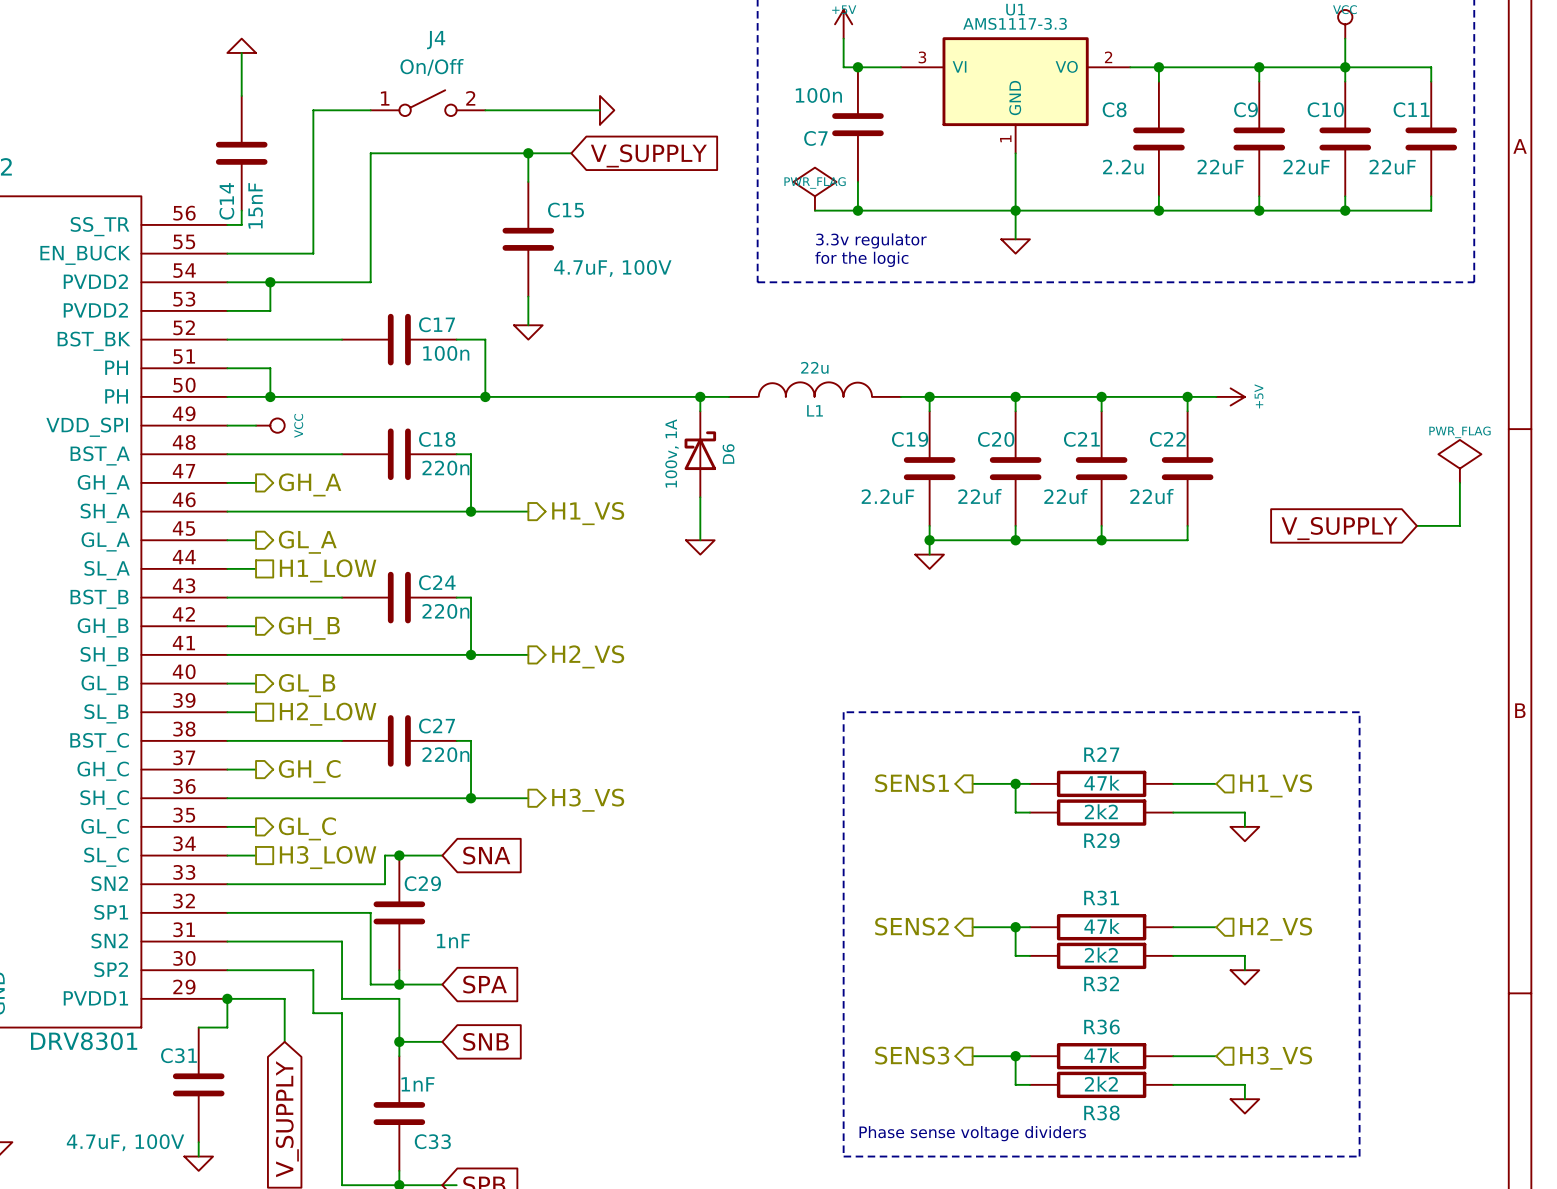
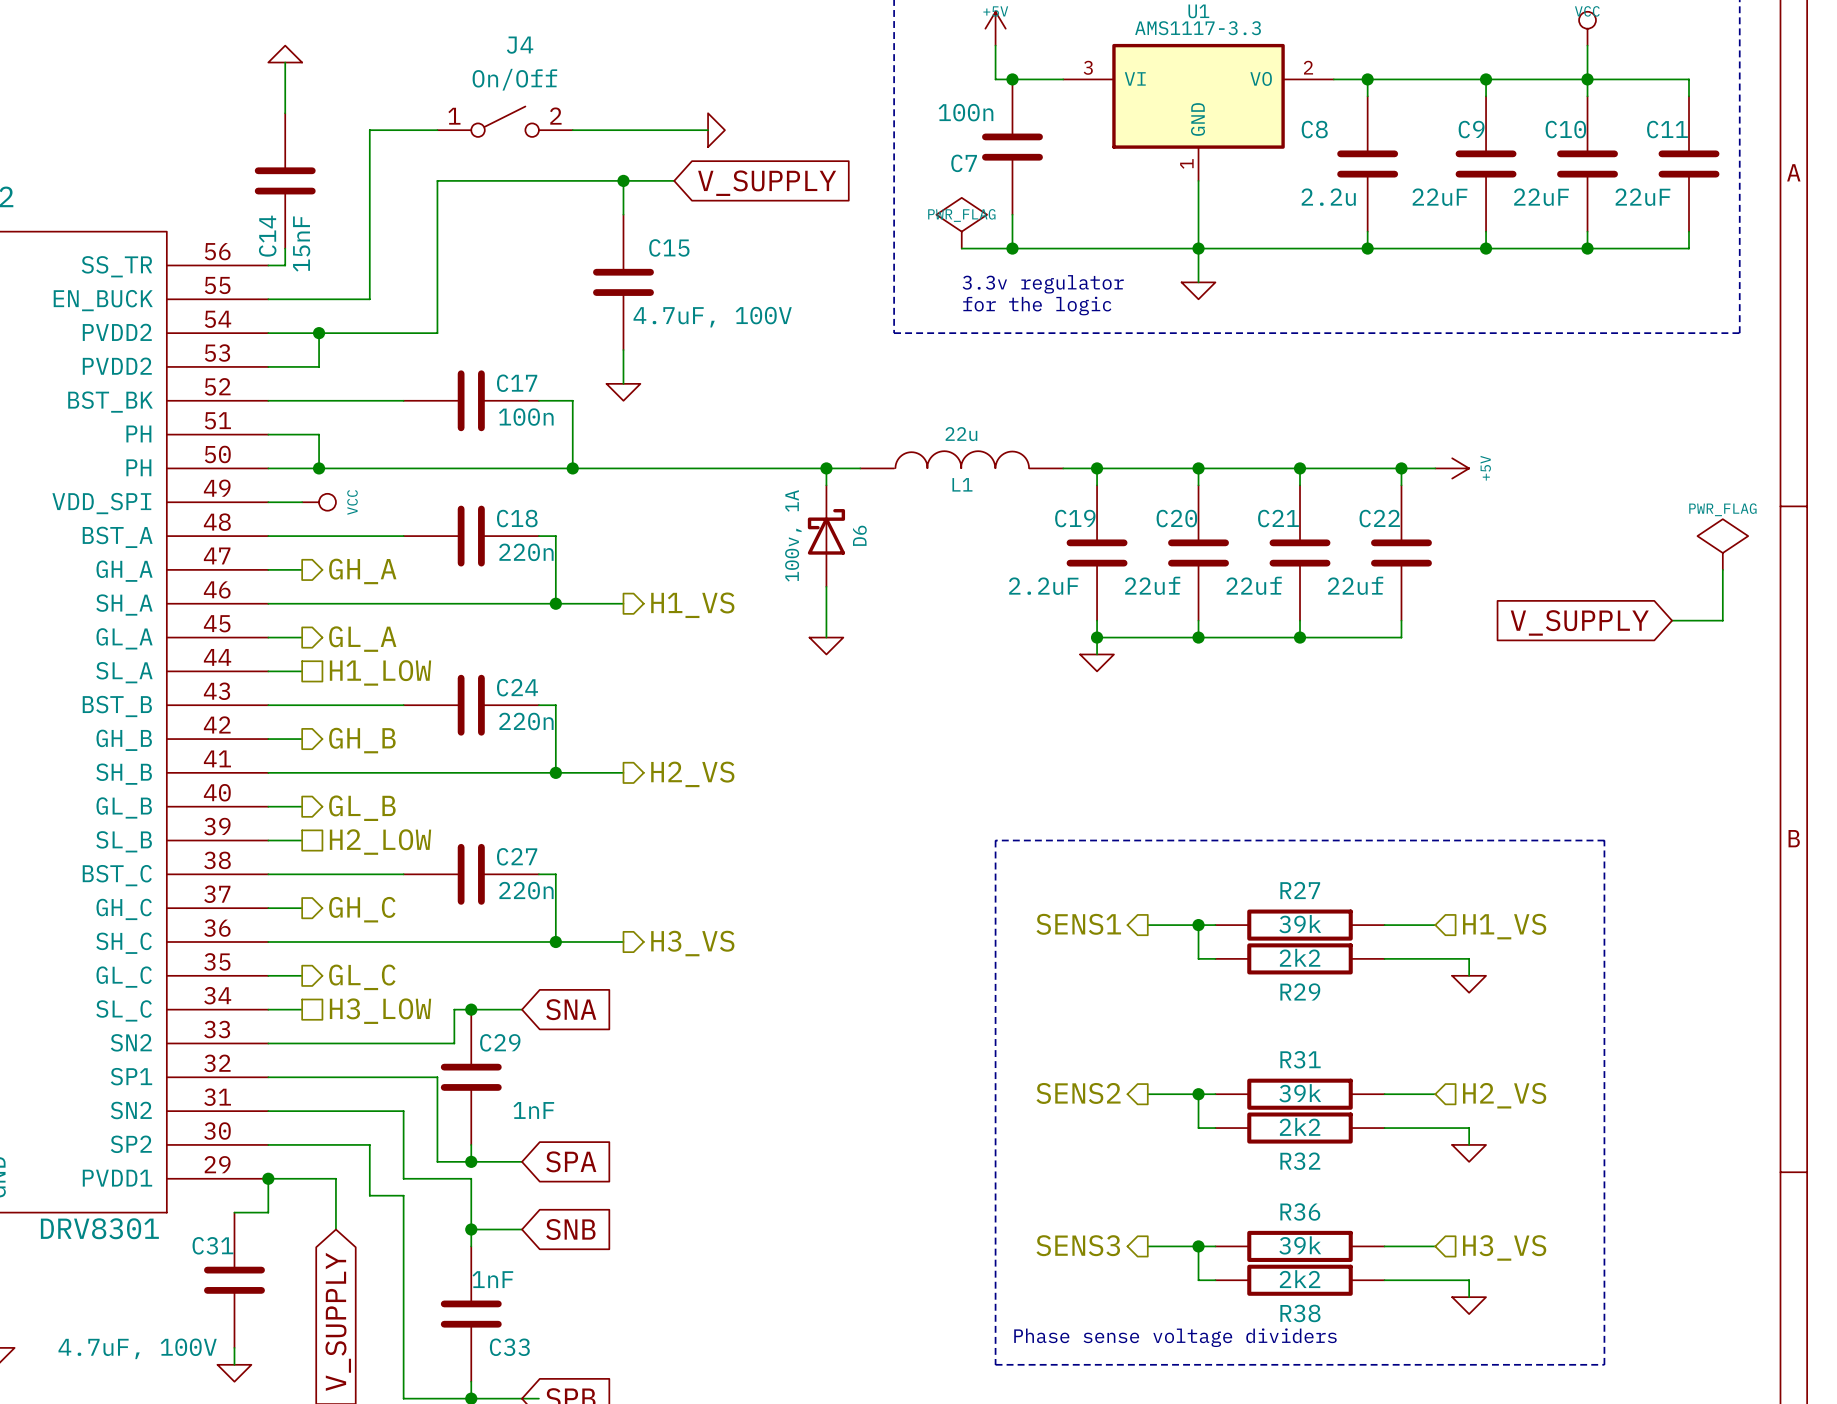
R27 value: 47k (1102, 783) -> 39k (1300, 924)
R31 value: 47k (1102, 926) -> 39k (1300, 1093)
R36 value: 47k (1102, 1055) -> 39k (1300, 1245)

